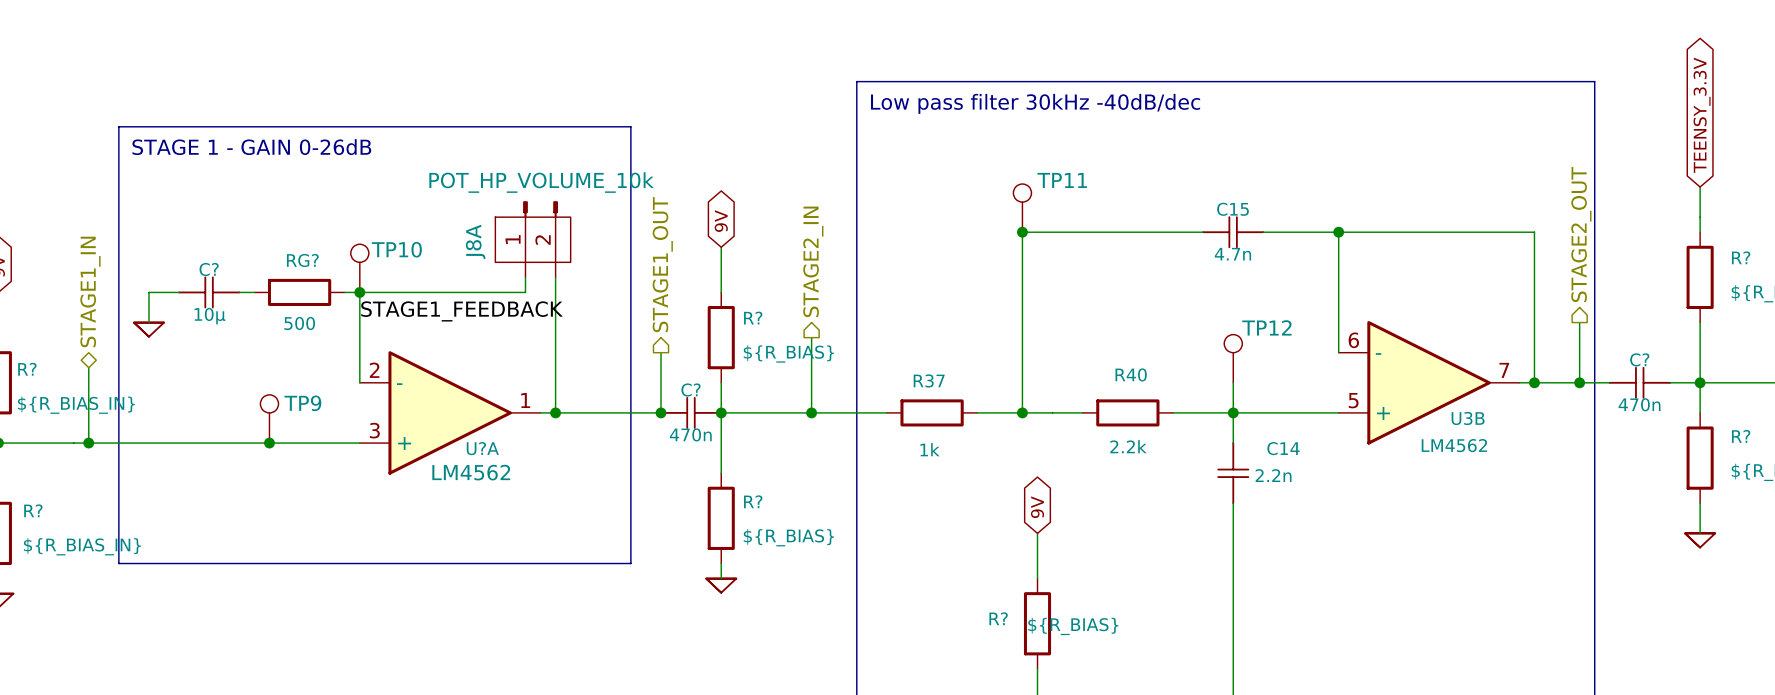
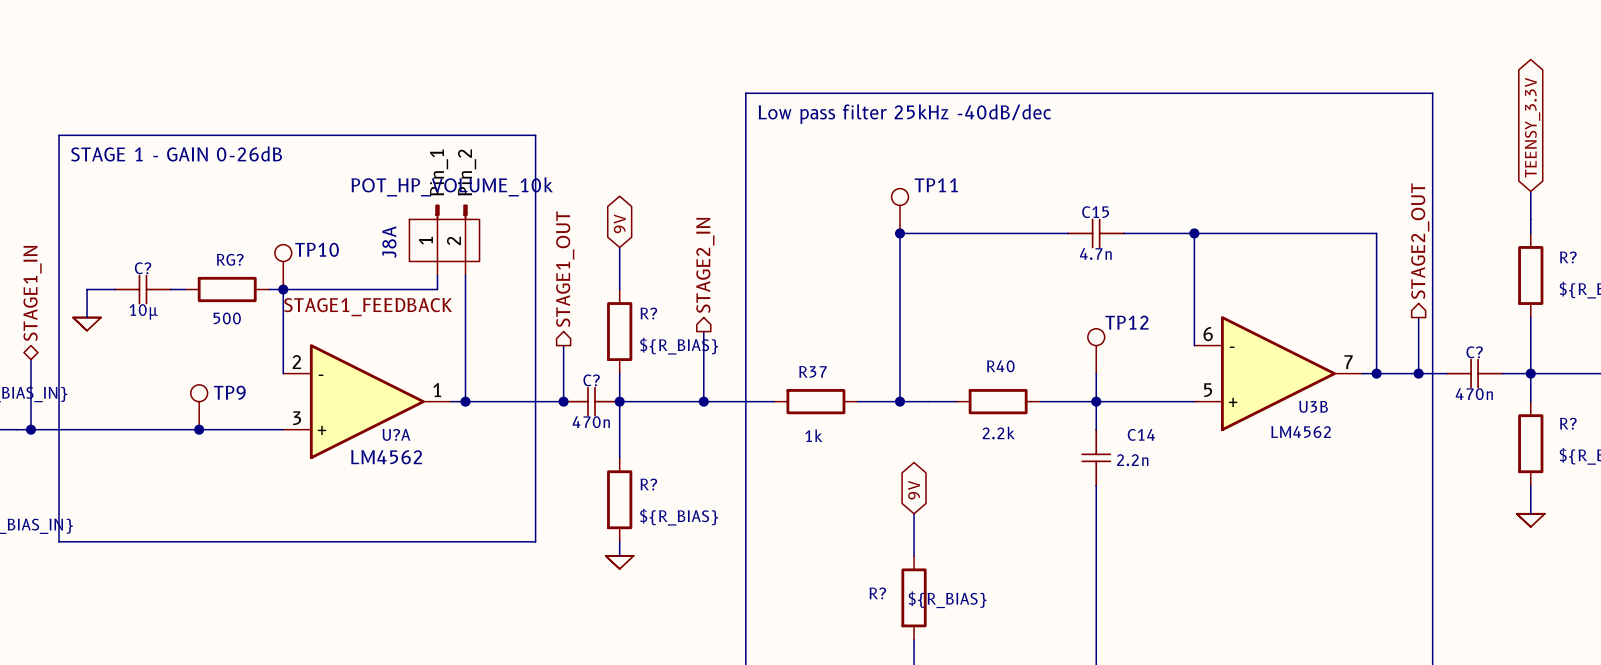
text: Low pass filter 30kHz -40dB/dec (1035, 103) -> Low pass filter 25kHz -40dB/dec (904, 114)
J8A pin name: none -> Pin_1 (439, 172)
J8A pin name: none -> Pin_2 (467, 172)

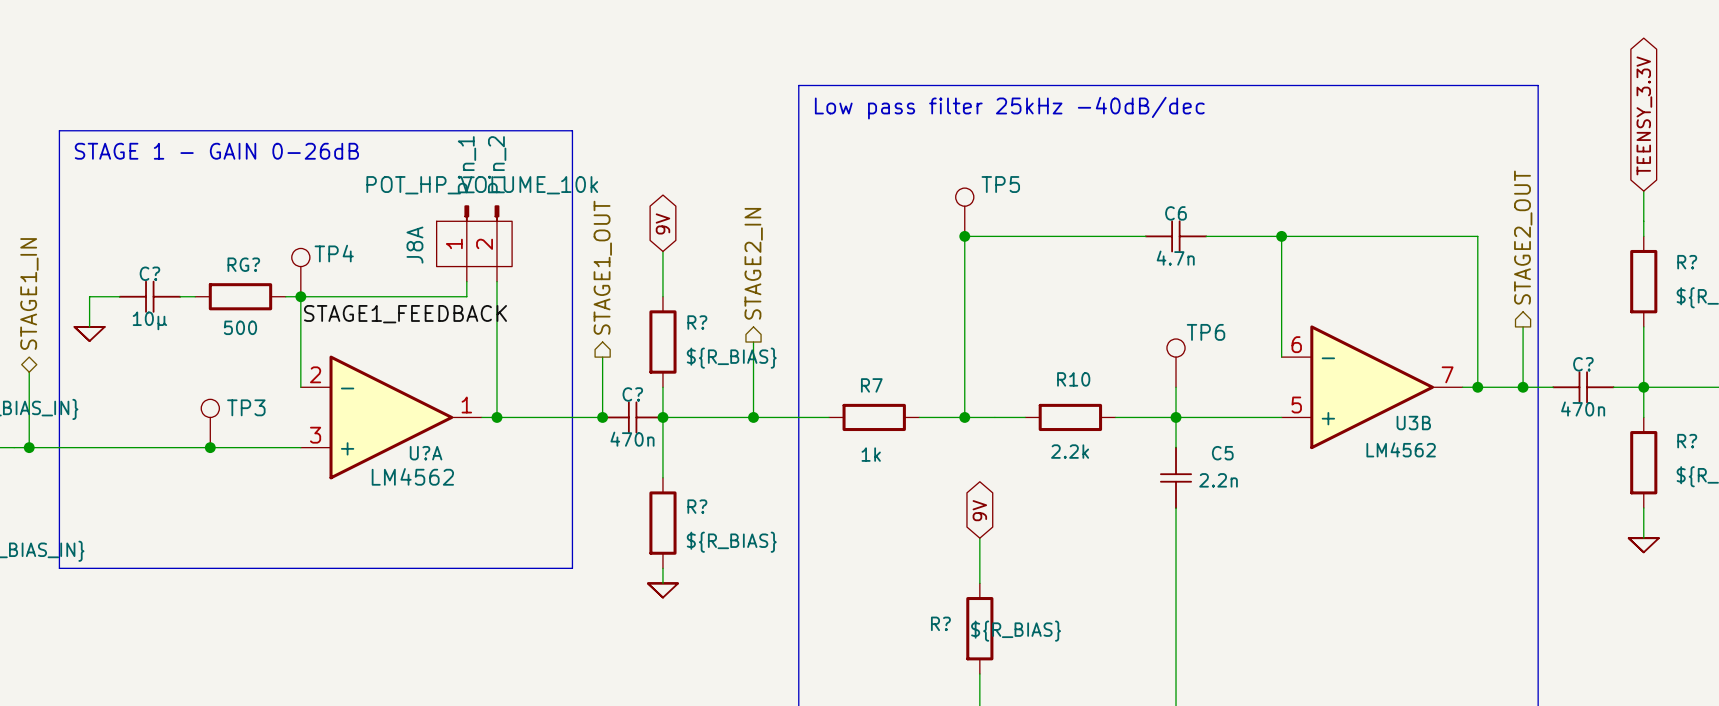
TP11 name: TP11 (936, 185) -> TP5 (1000, 184)
C15 name: C15 (1095, 212) -> C6 (1176, 213)
TP10 name: TP10 (317, 249) -> TP4 (334, 253)
TP12 name: TP12 (1126, 322) -> TP6 (1206, 332)
R40 name: R40 (1000, 366) -> R10 (1073, 379)
R37 name: R37 (812, 371) -> R7 (871, 385)
TP9 name: TP9 (229, 392) -> TP3 (246, 407)
C14 name: C14 (1141, 434) -> C5 (1222, 453)

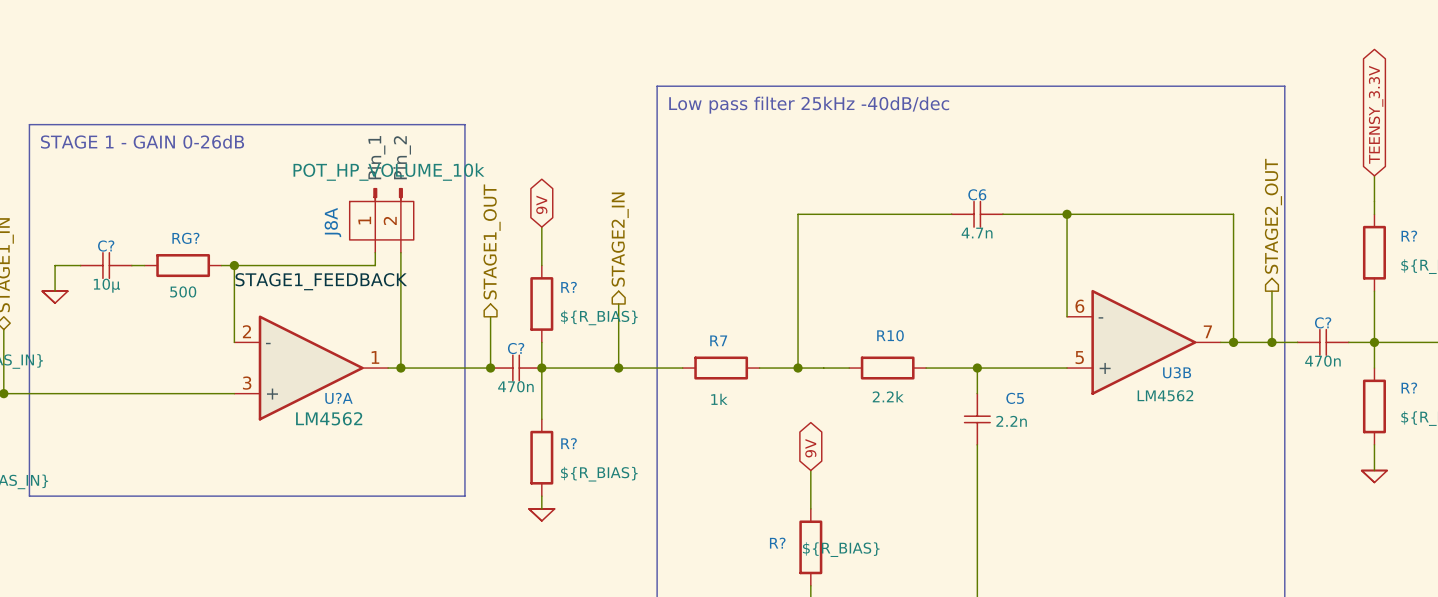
TP5: (964, 212) -> none
junction: (964, 236) -> none
TP4: (300, 272) -> none
TP6: (1176, 363) -> none
wire: (1176, 387) (1176, 417) -> none
TP3: (210, 423) -> none
junction: (210, 447) -> none

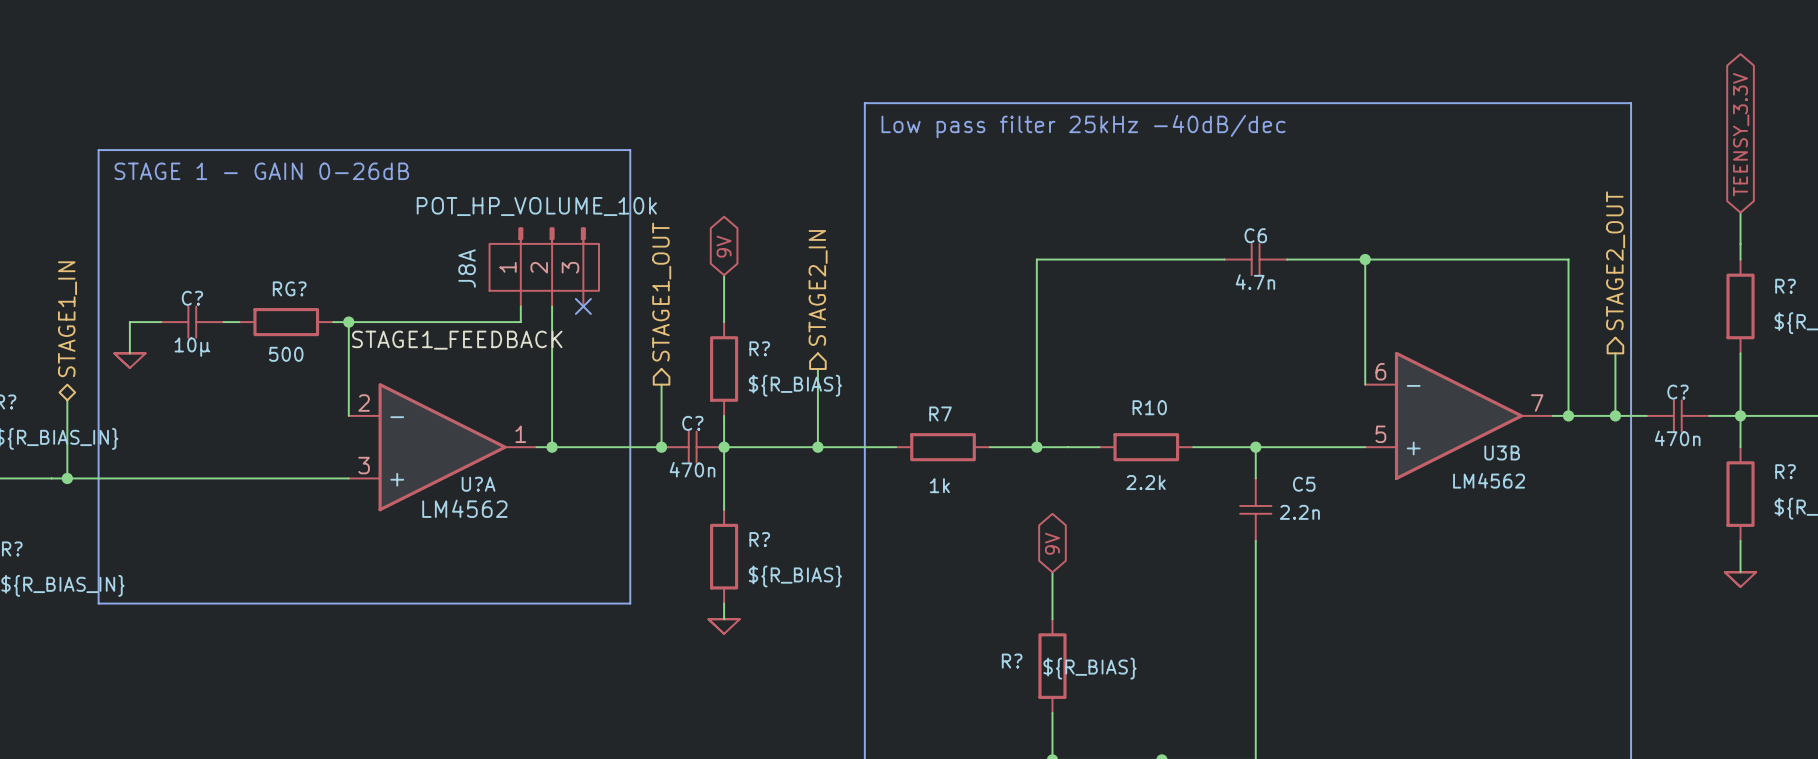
J8A symbol: [349, 187, 414, 253] -> [489, 227, 600, 307]
no-connect mark: none -> (583, 306)

